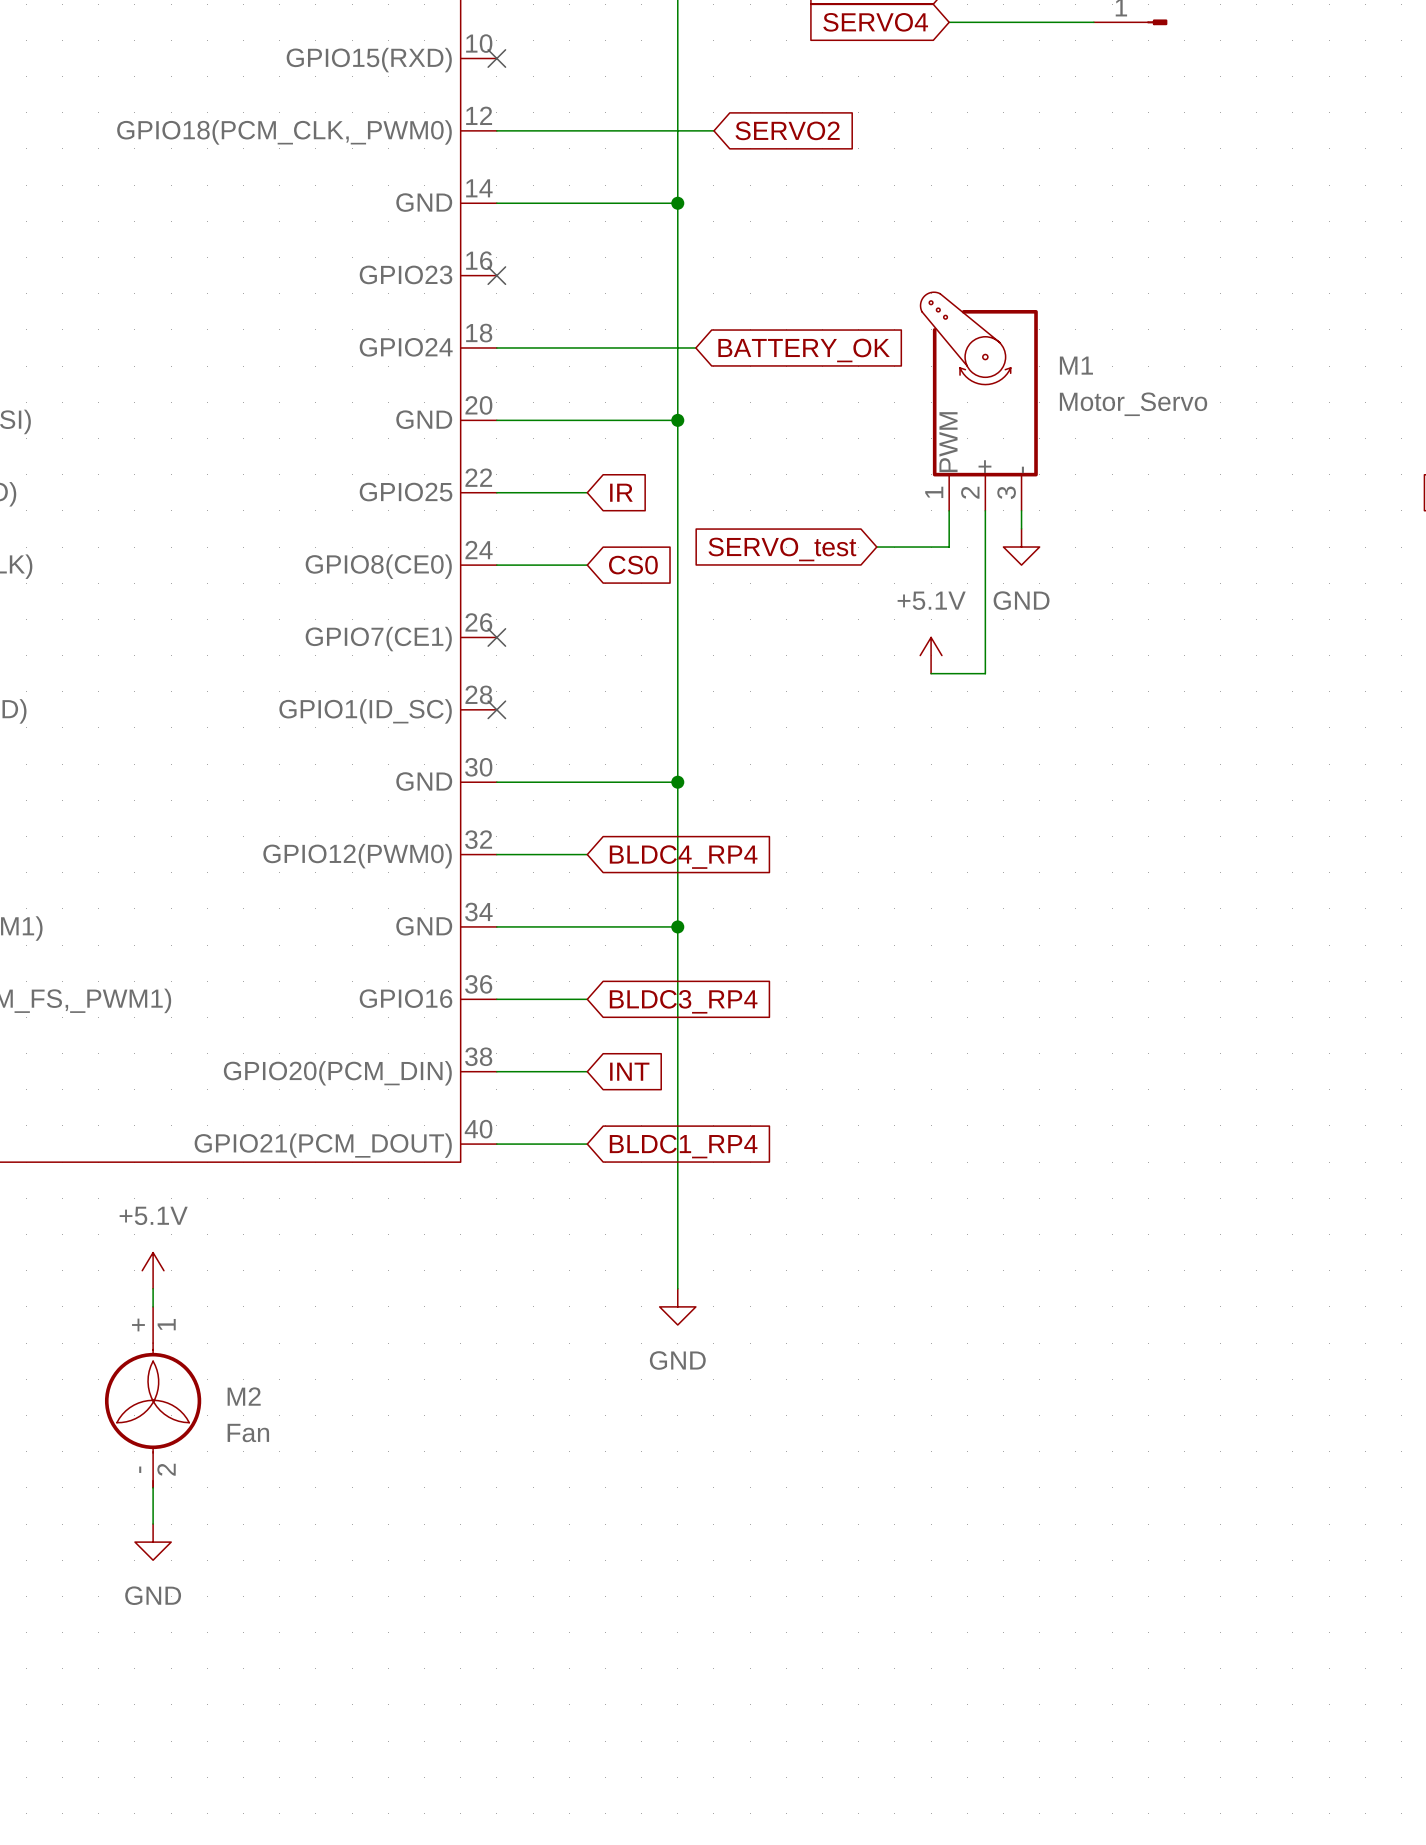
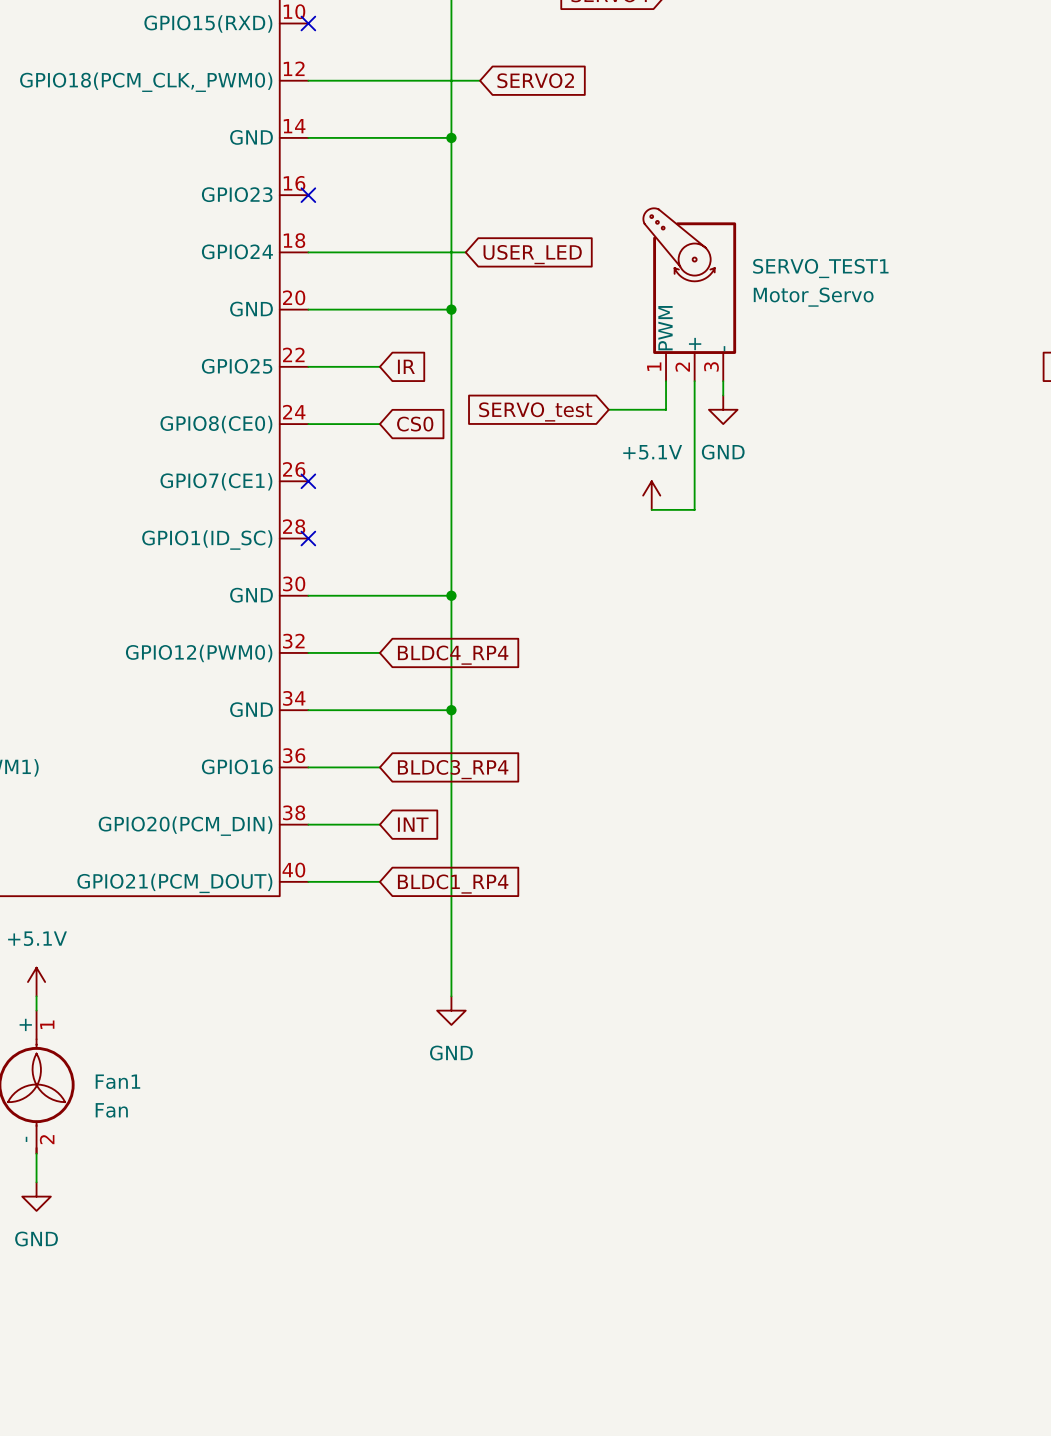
global label: BATTERY_OK (804, 350) -> USER_LED (532, 254)
M1 name: M1 (1076, 365) -> SERVO_TEST1 (820, 268)
M2 name: M2 (244, 1396) -> Fan1 (117, 1081)

